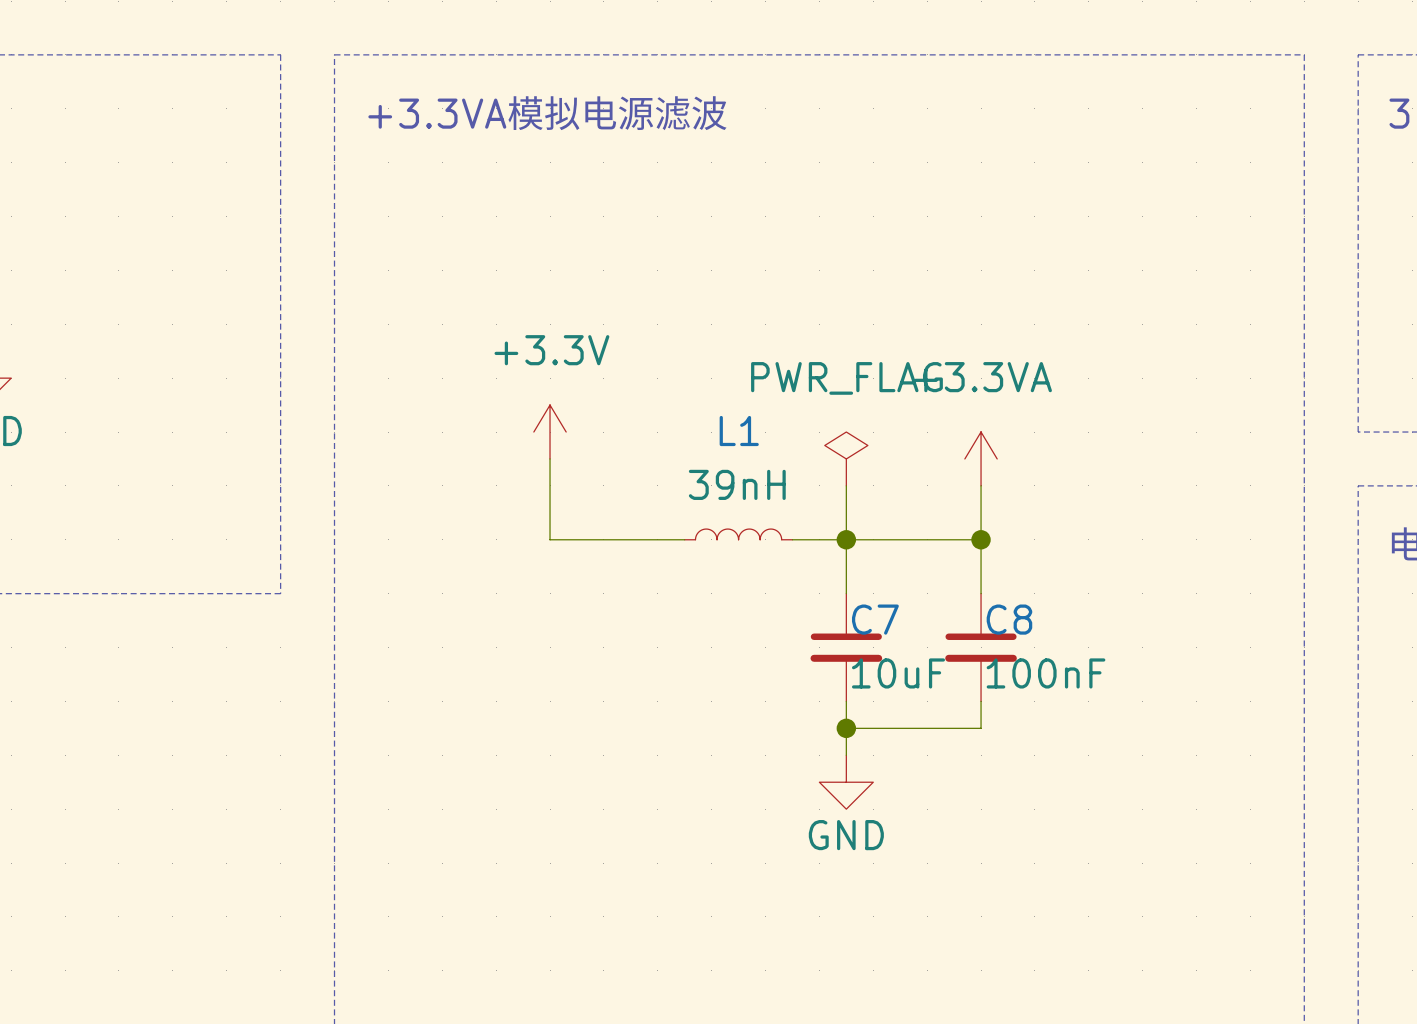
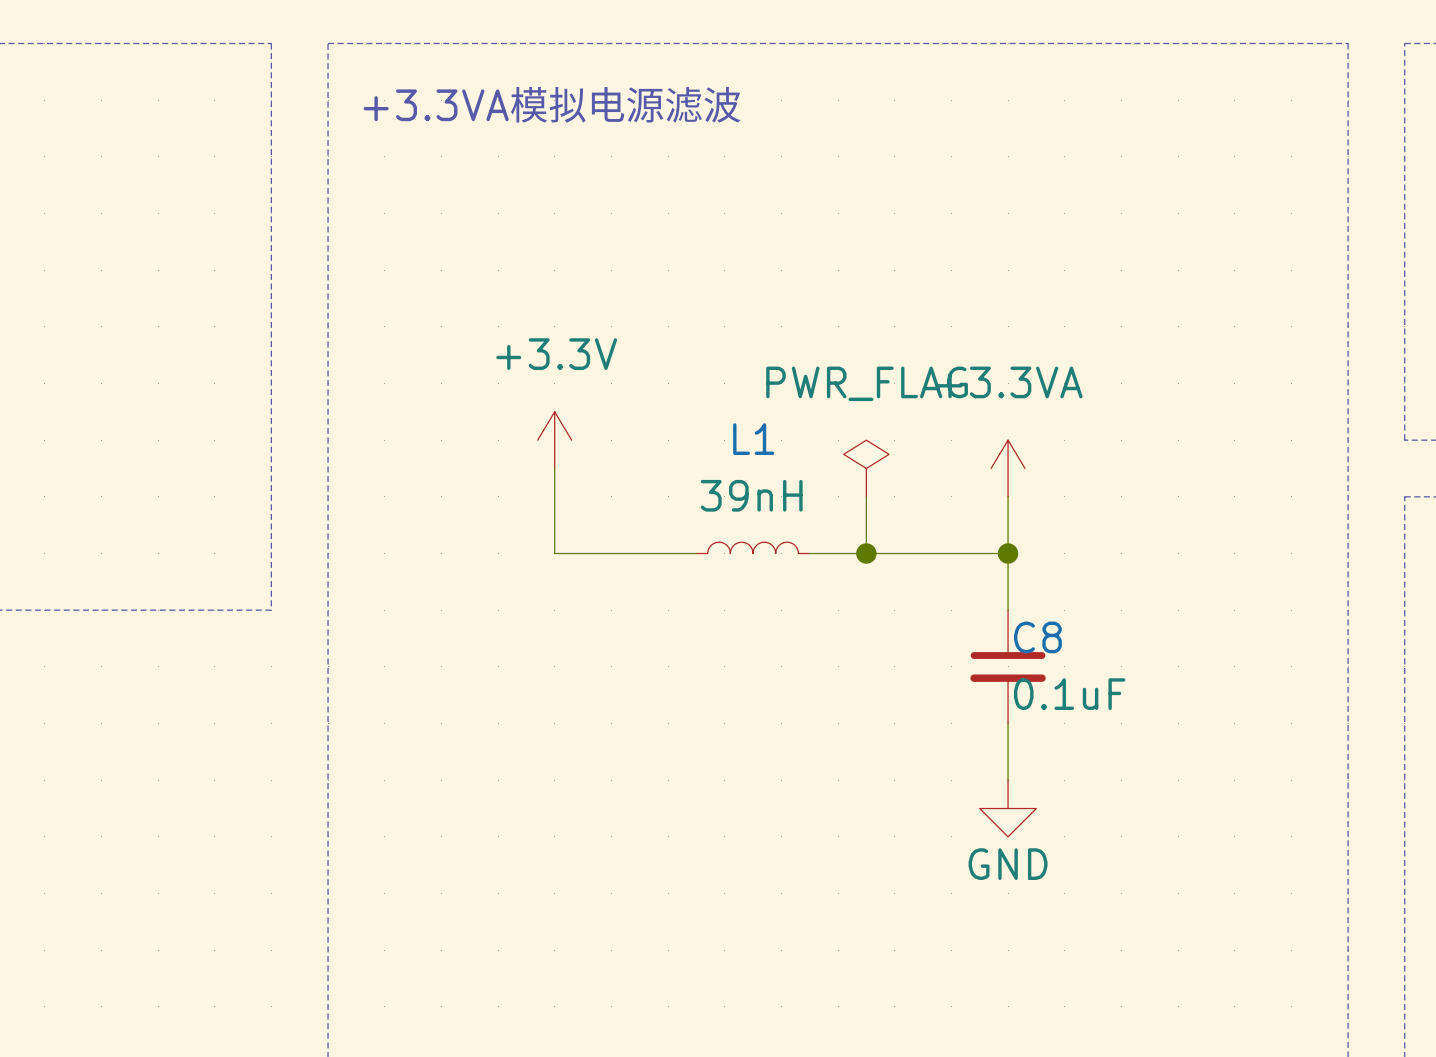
wire: (846, 539) (846, 593) -> none
C7: 10uF (846, 647) -> none
C8 value: 100nF (1046, 673) -> 0.1uF (1069, 694)
wire: (846, 701) (846, 755) -> none
wire: (846, 728) (981, 728) -> (1008, 780) (1008, 751)
junction: (846, 728) -> none
power symbol position: GND (846, 782) -> GND (1008, 808)

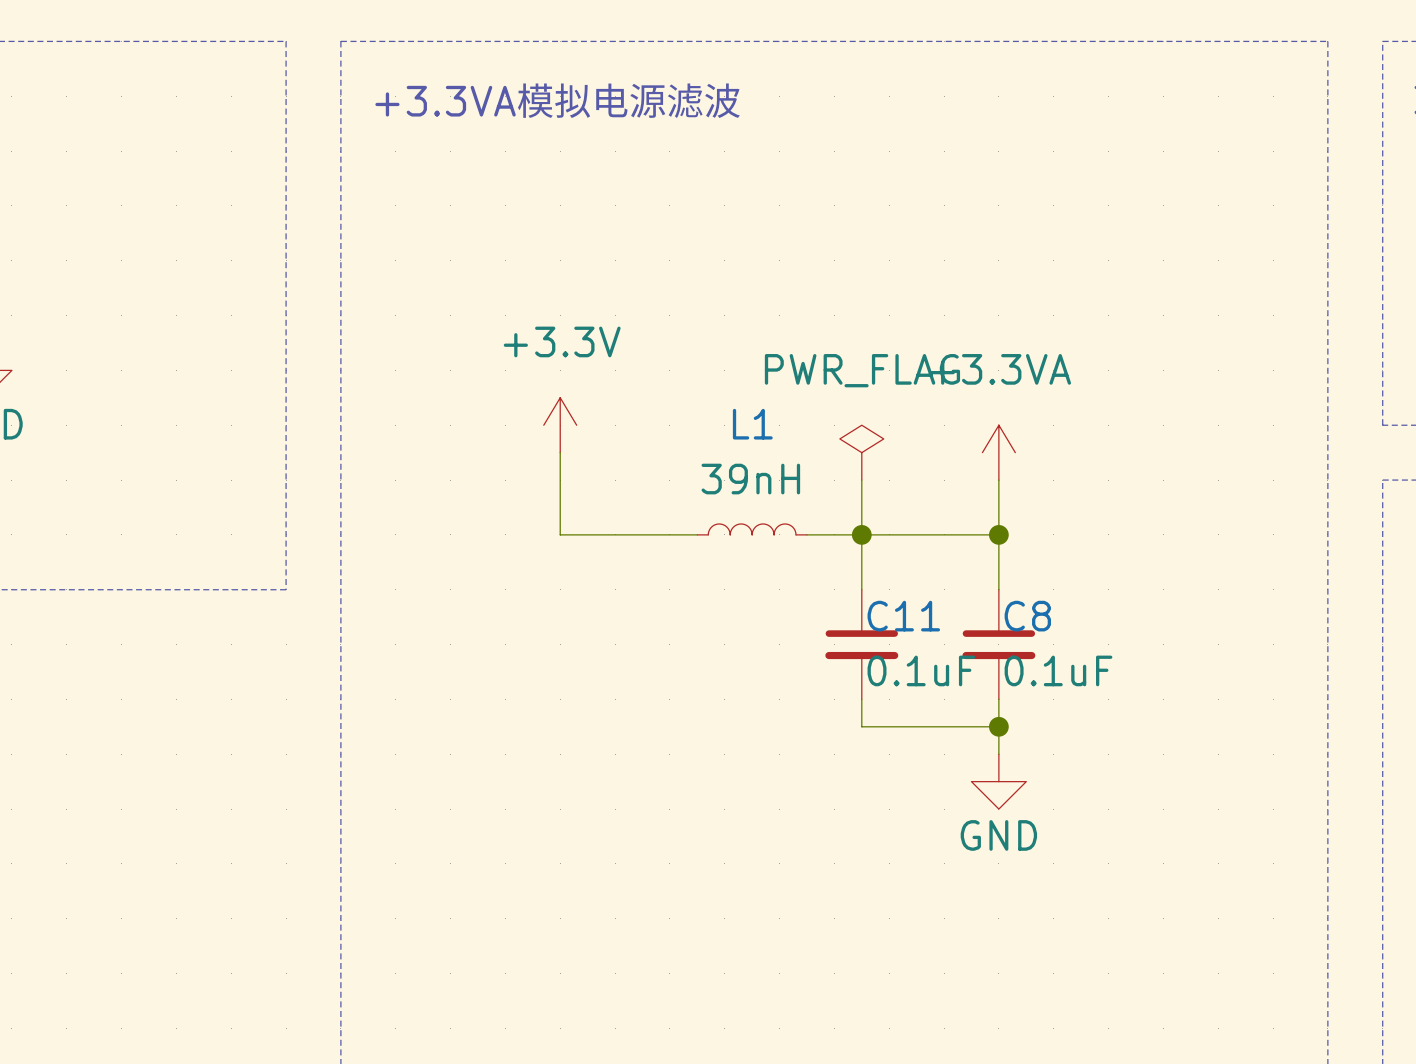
wire: none -> (861, 534) (861, 589)
C11: none -> 0.1uF (861, 644)
wire: none -> (861, 699) (861, 726) (998, 726)
junction: none -> (998, 726)

